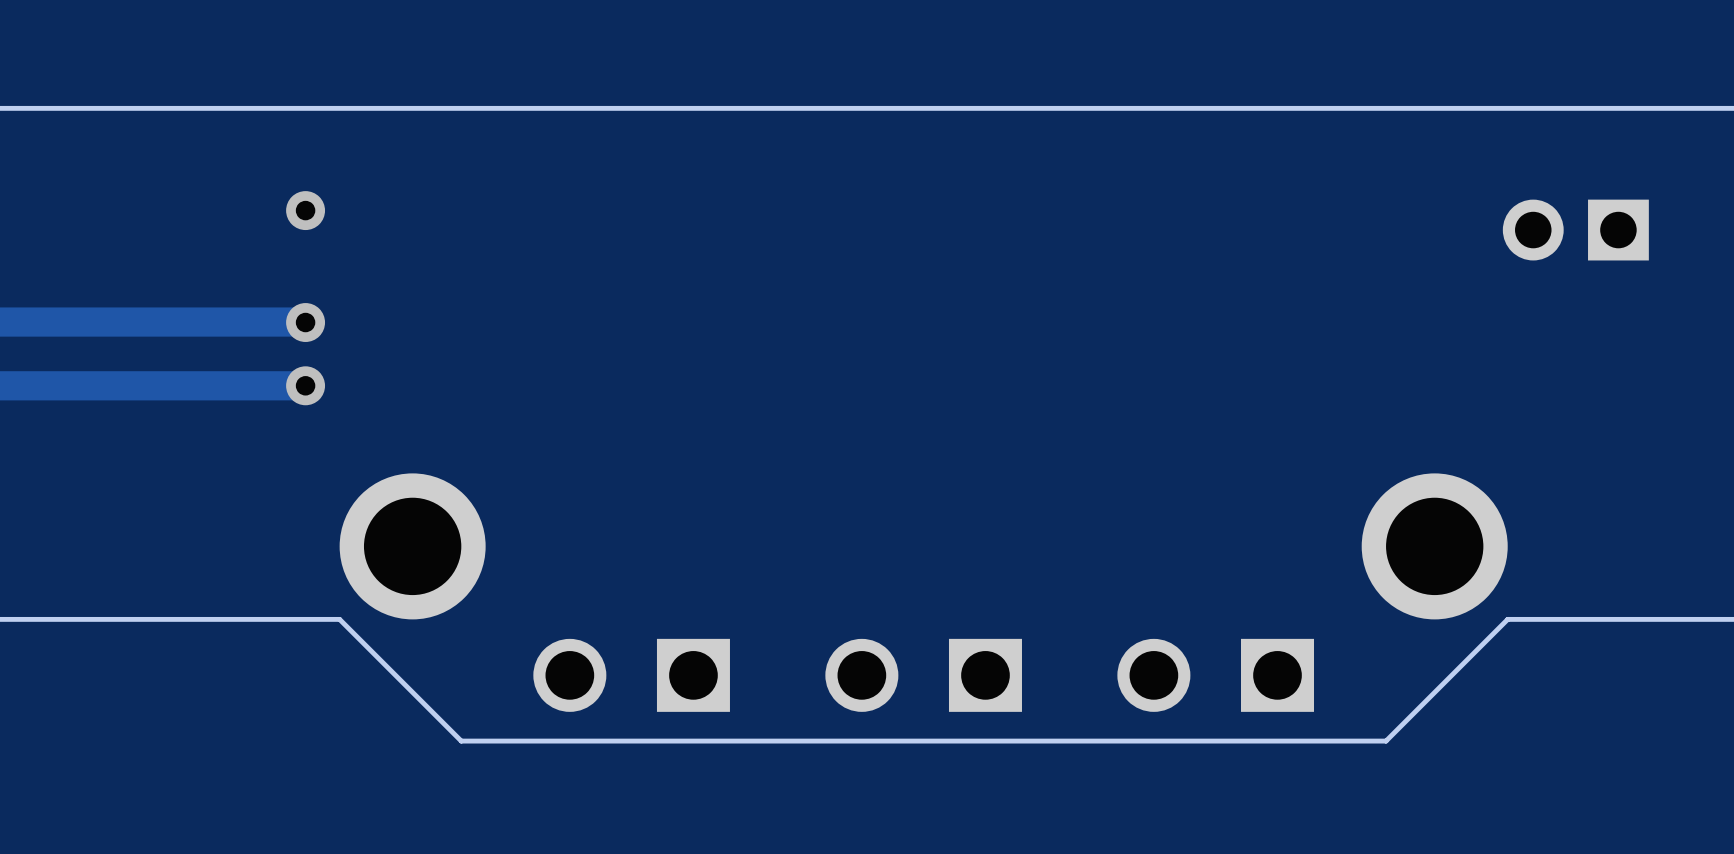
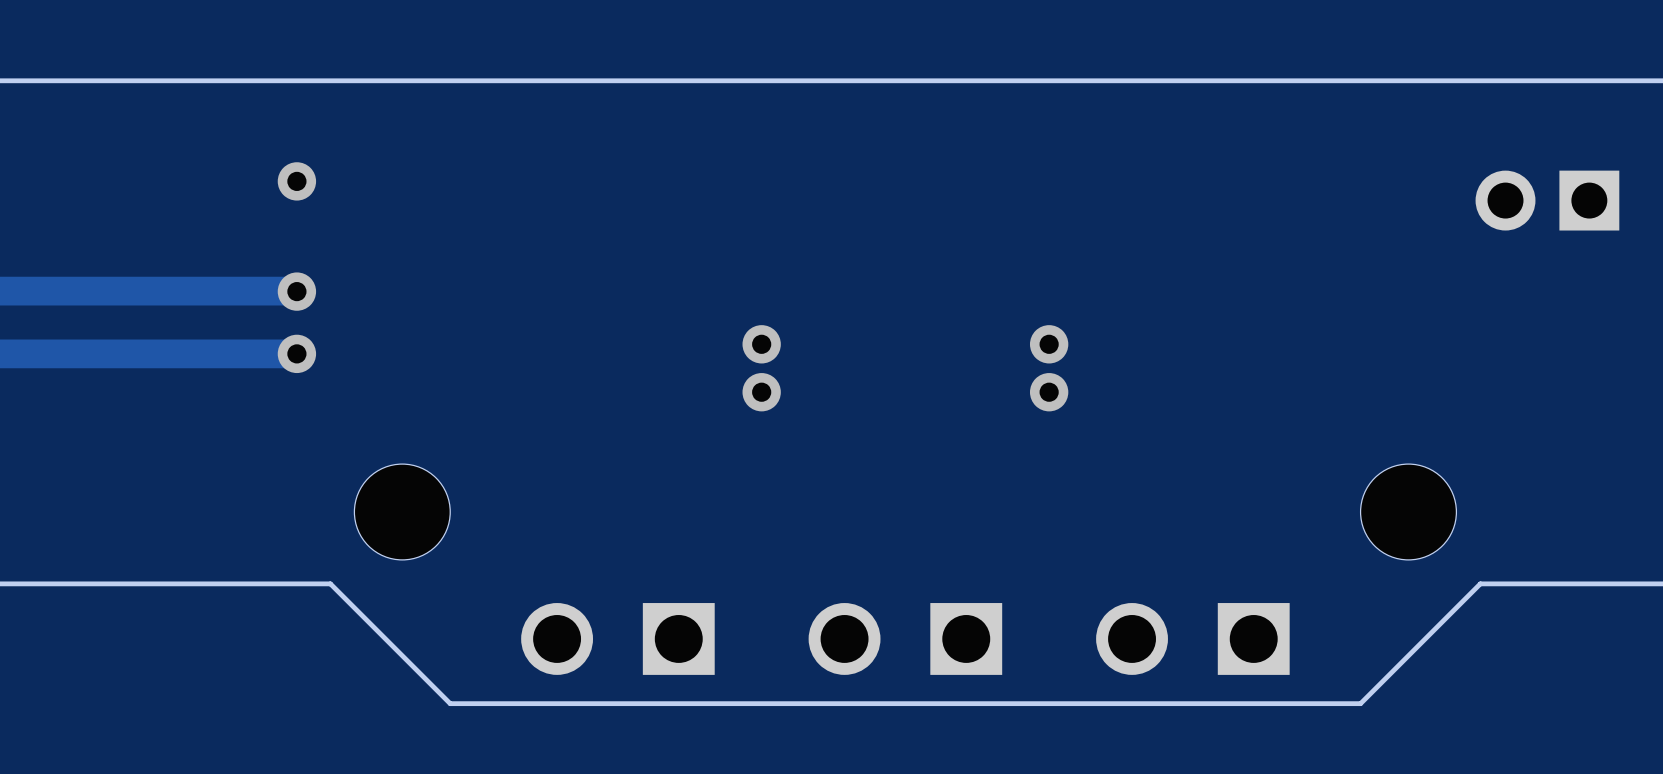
via: none -> (761, 344)
via: none -> (1049, 344)
via: none -> (761, 392)
via: none -> (1049, 392)
part footprint: [339, 473, 486, 620] -> [354, 464, 451, 560]
part footprint: [1361, 473, 1508, 620] -> [1360, 464, 1457, 560]

